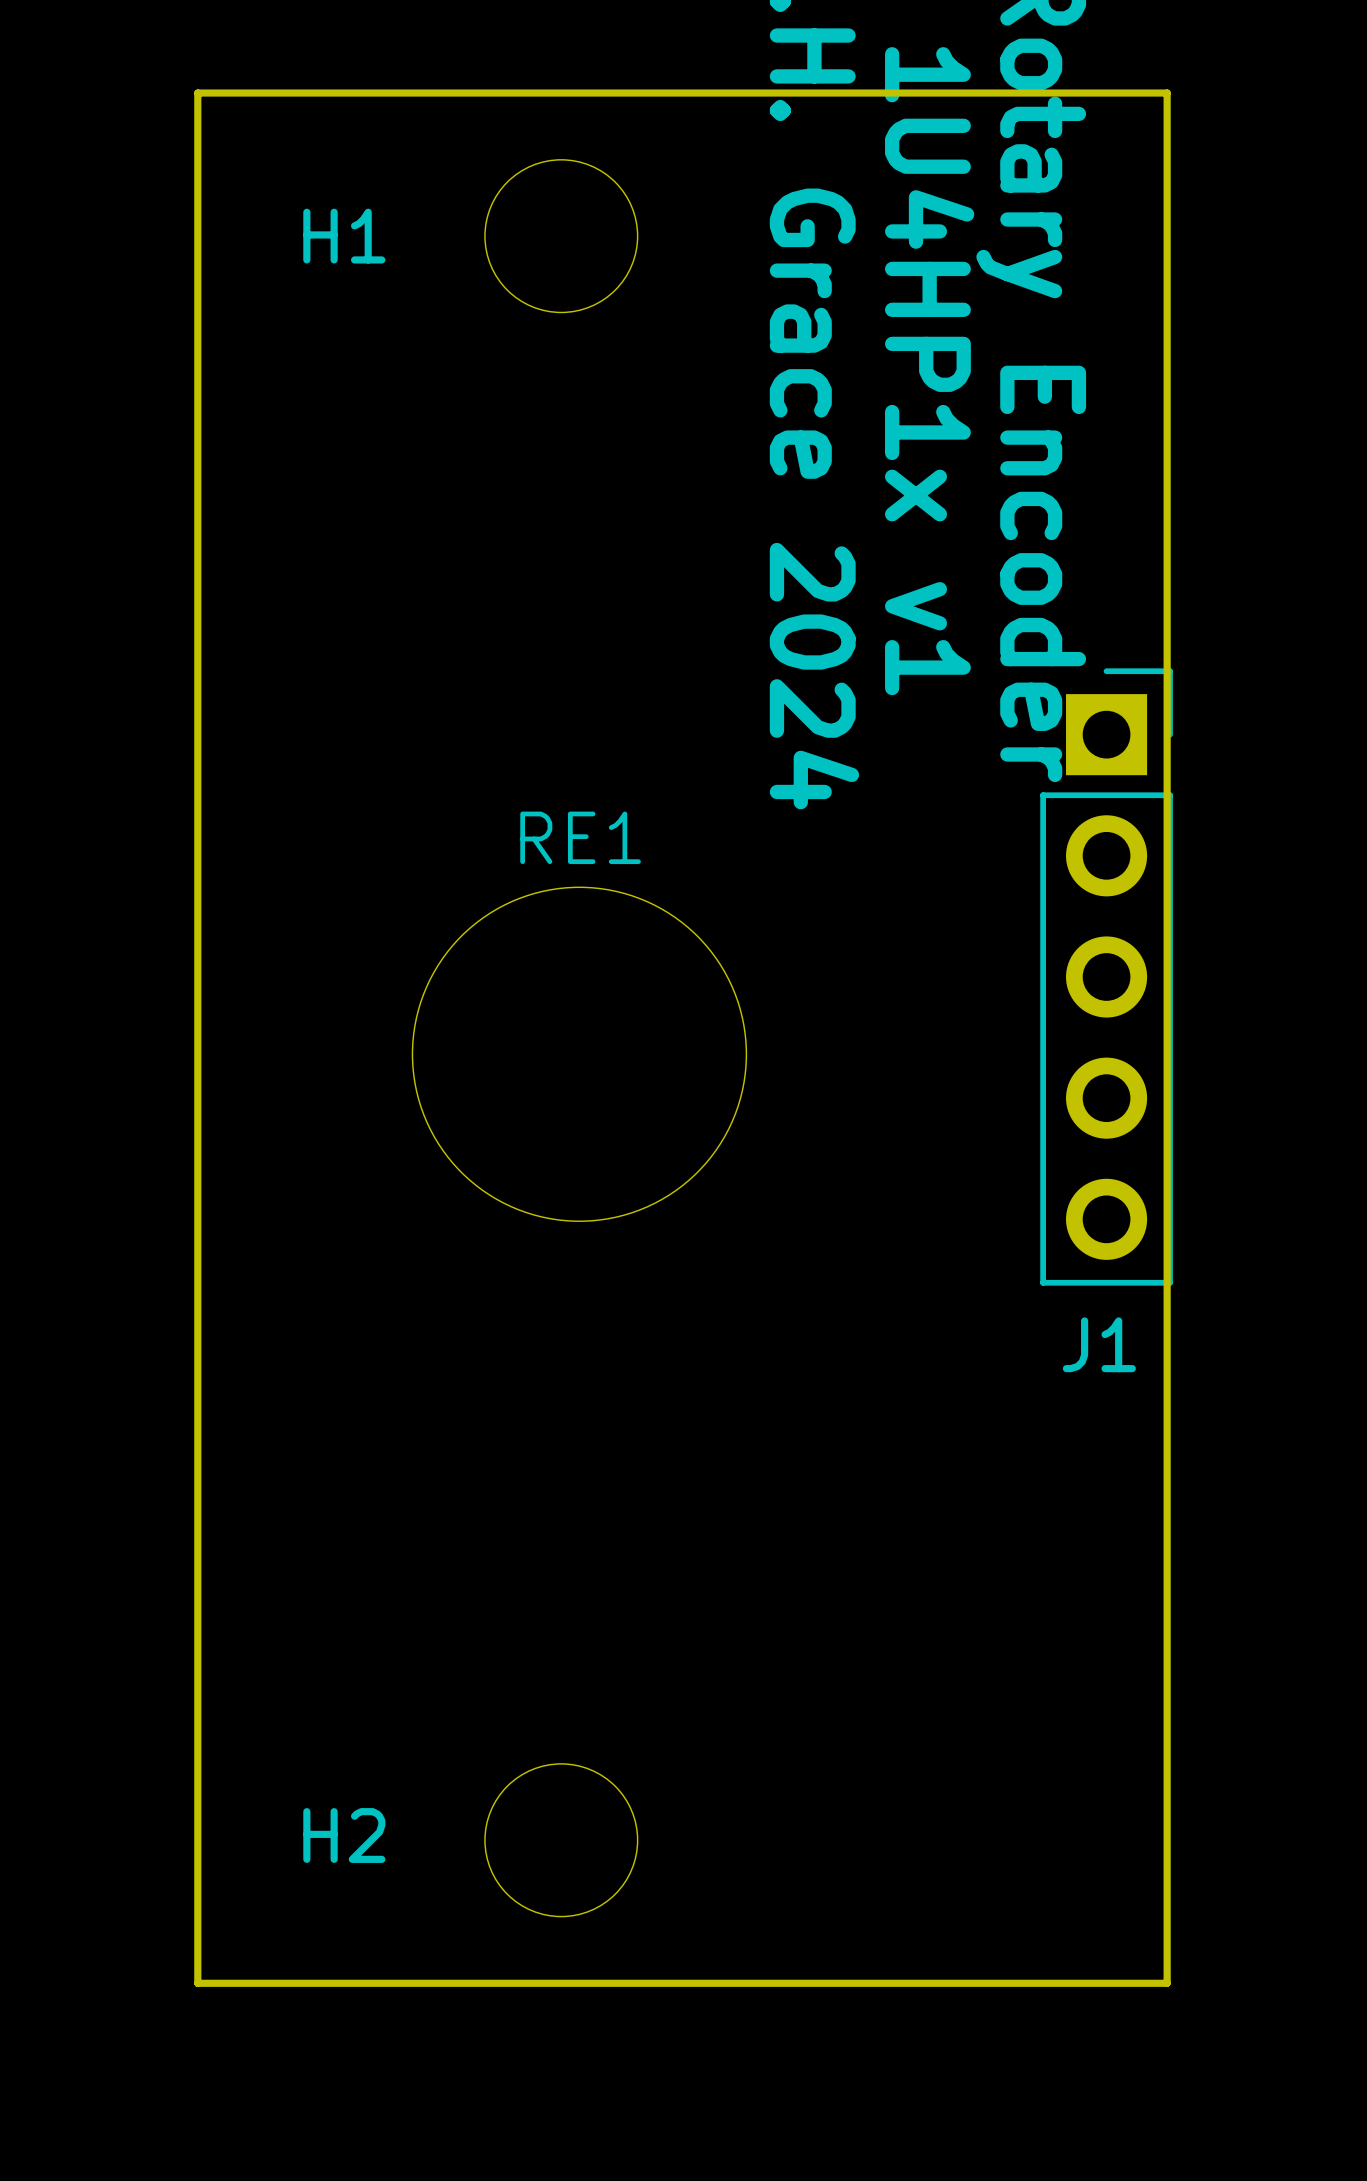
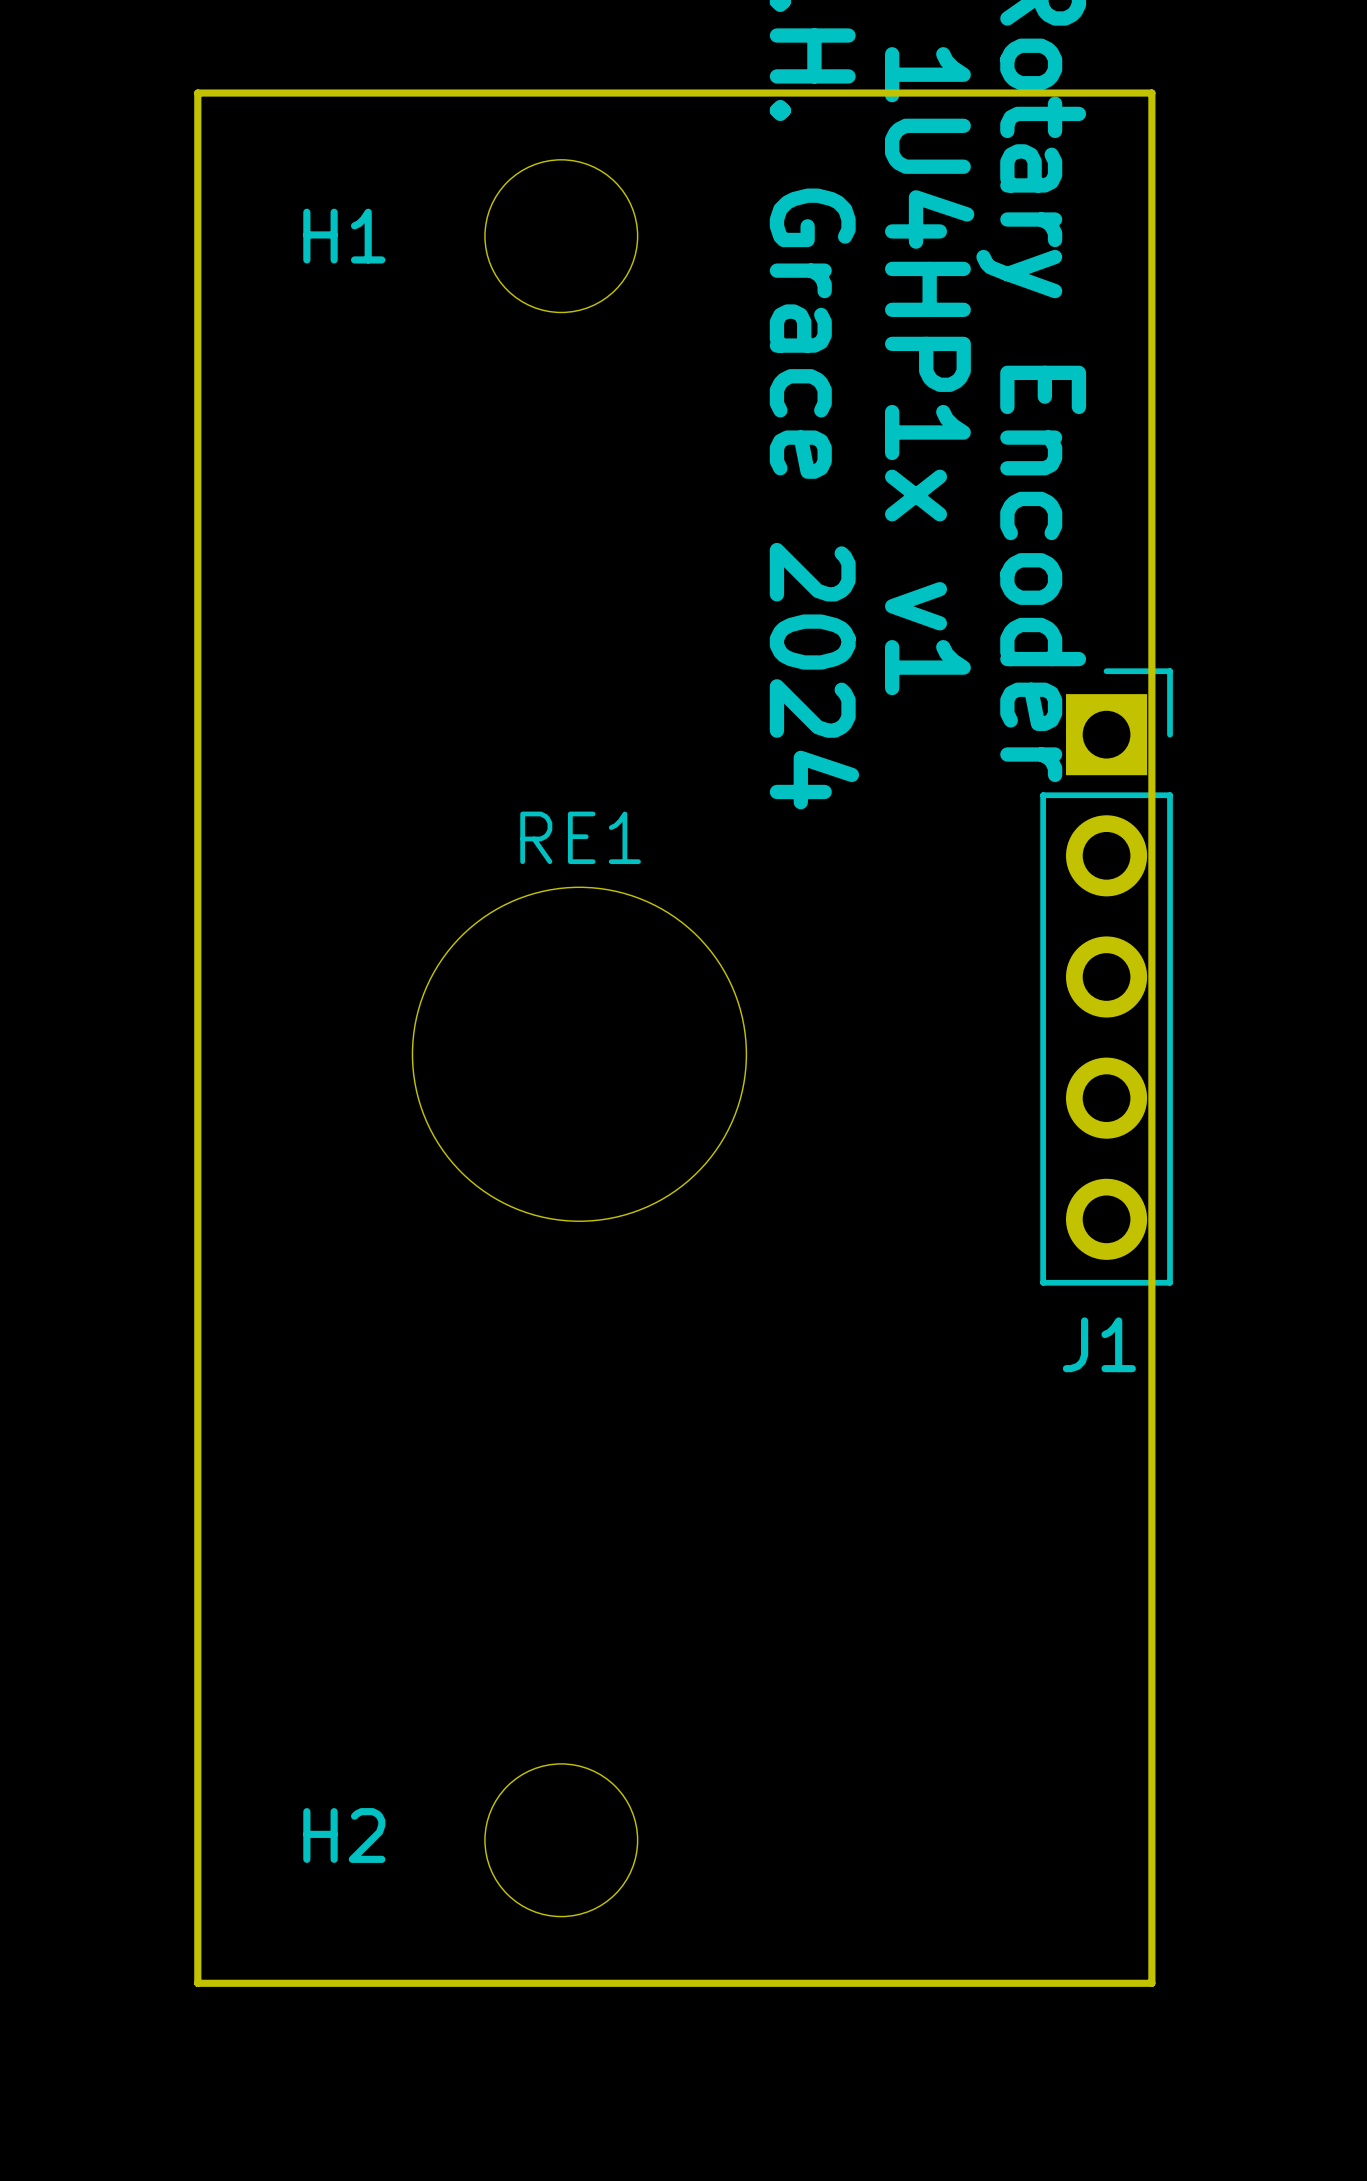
board edge: (1151, 93) (1167, 93) (1167, 1983) (1151, 1983) -> (1151, 93) (1151, 1983)

